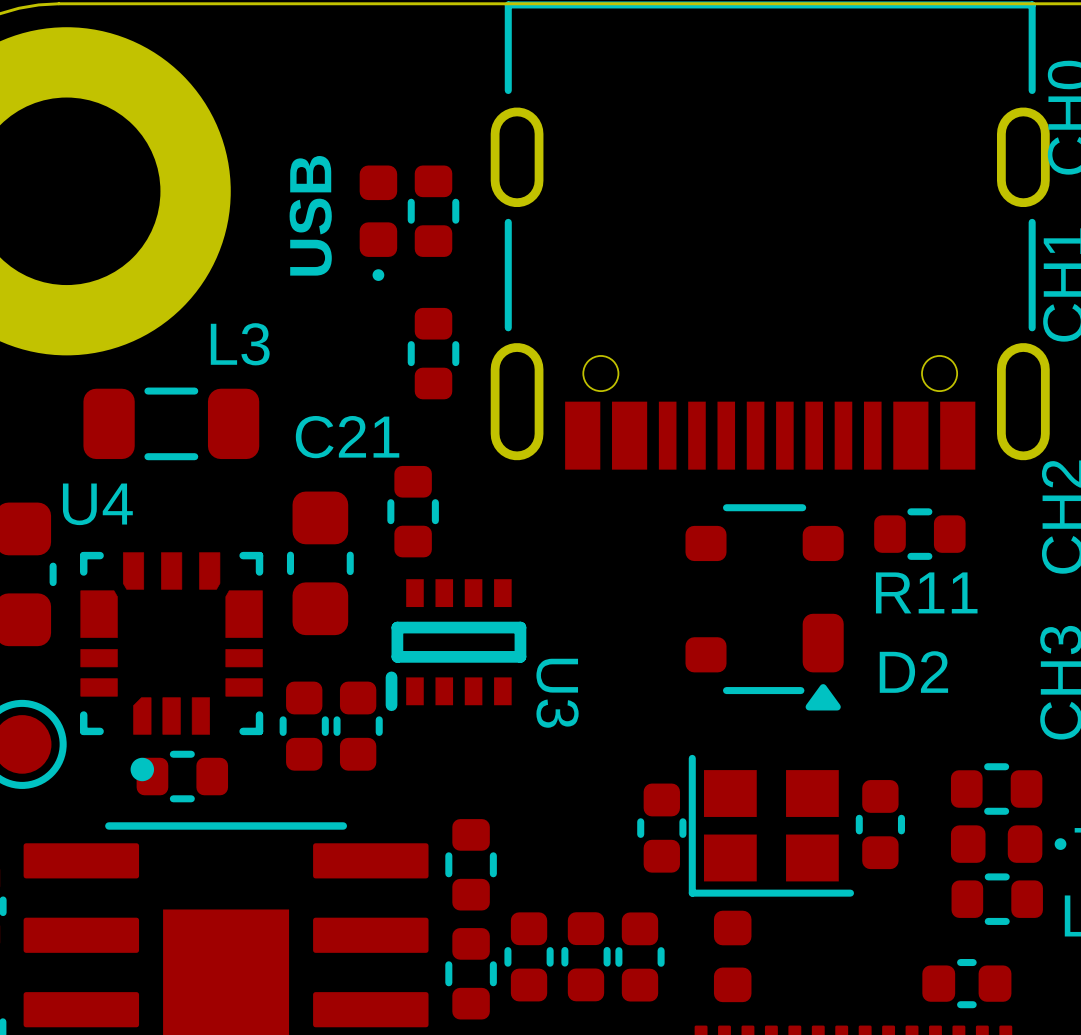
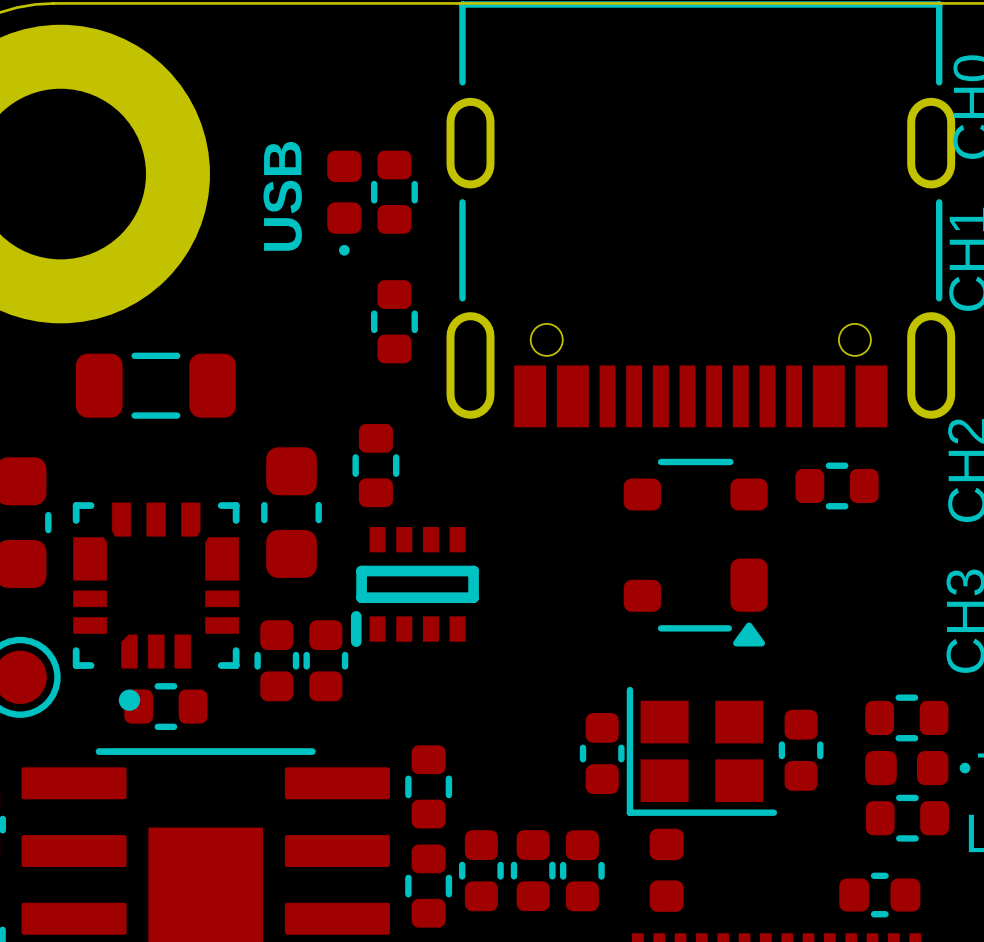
L3 name: L3 (240, 344) -> none
C21 name: C21 (347, 437) -> none
U4 name: U4 (97, 504) -> none
R11 name: R11 (926, 592) -> none
D2 name: D2 (913, 672) -> none
U3 name: U3 (557, 693) -> none

